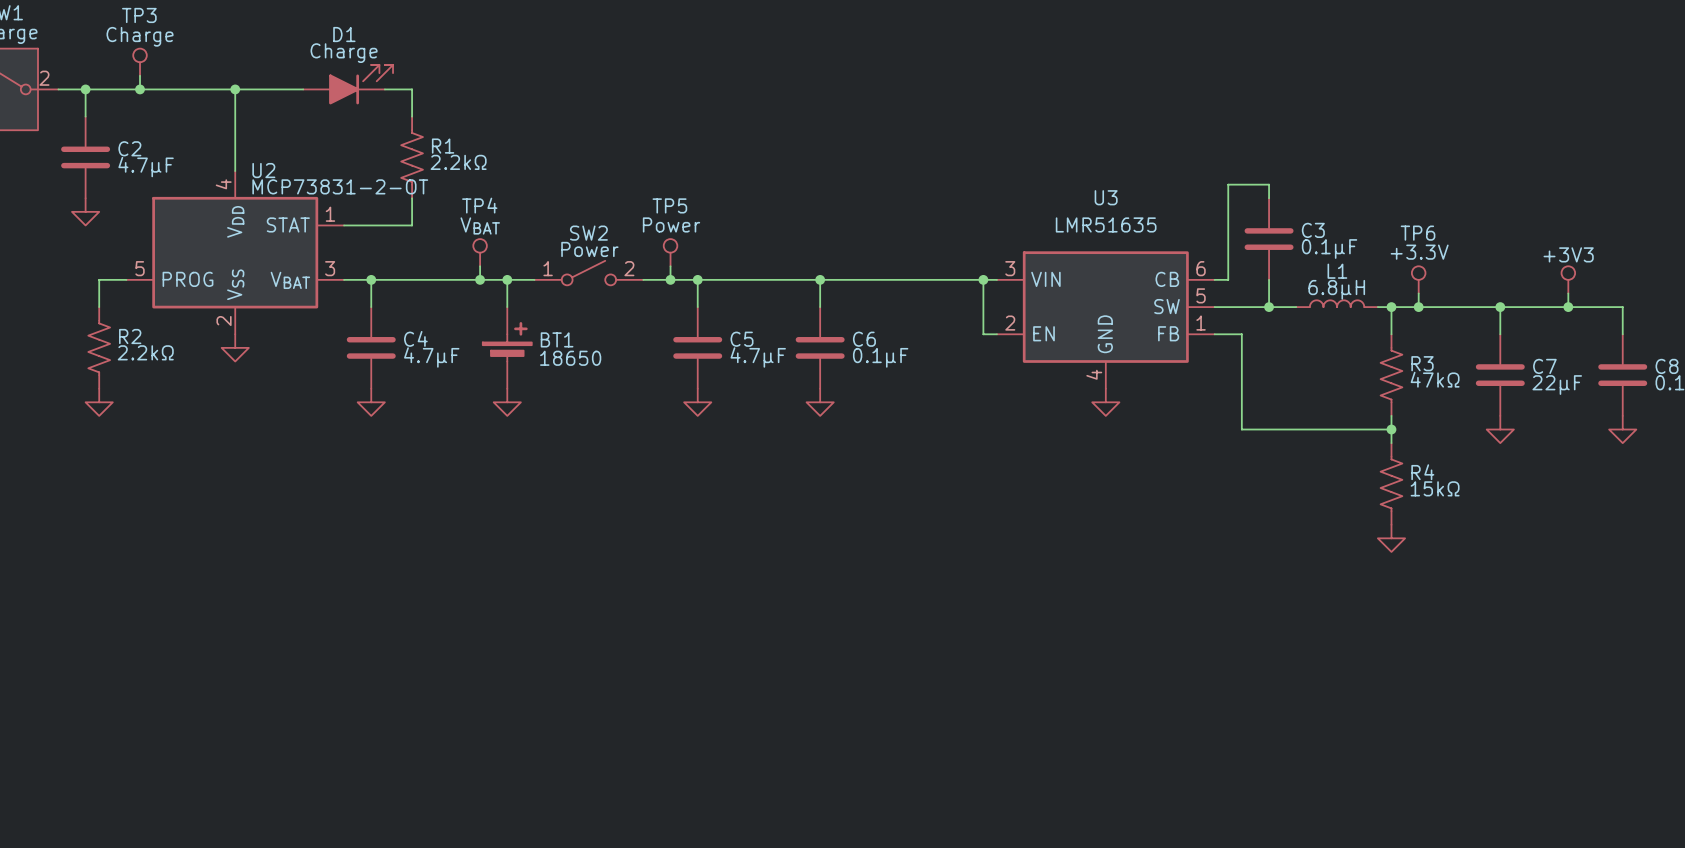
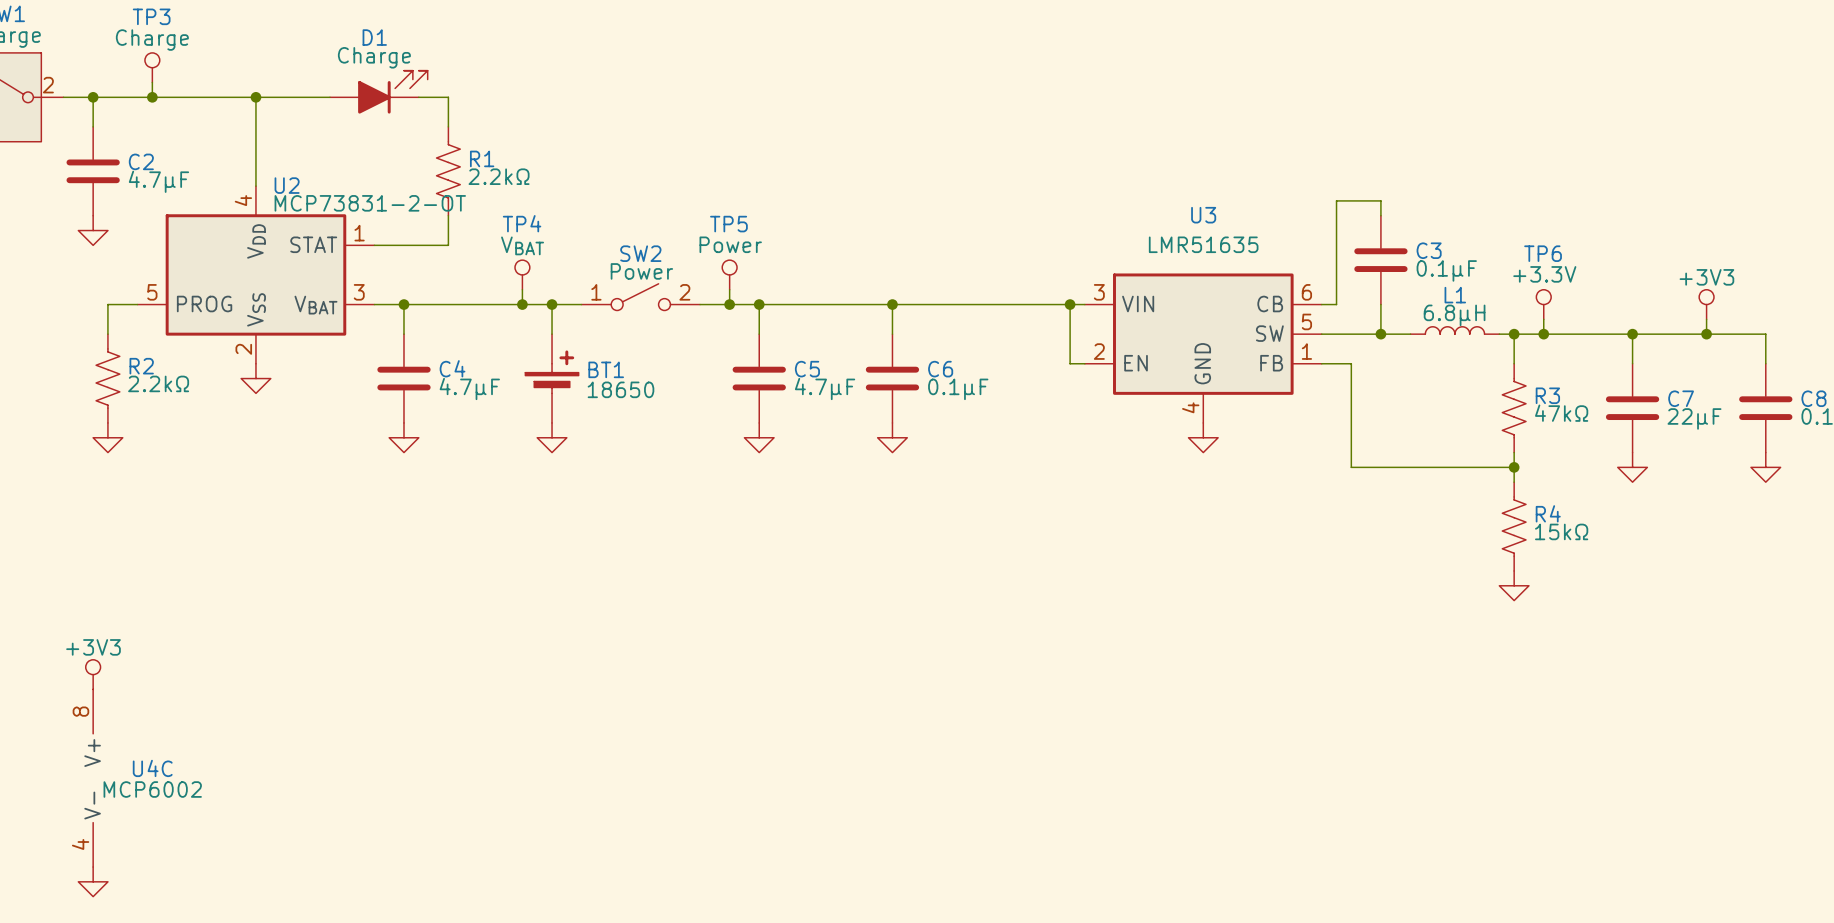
power symbol: none -> +3V3 (93, 674)
U4C: none -> MCP6002 (93, 778)
power symbol: none -> (93, 881)

